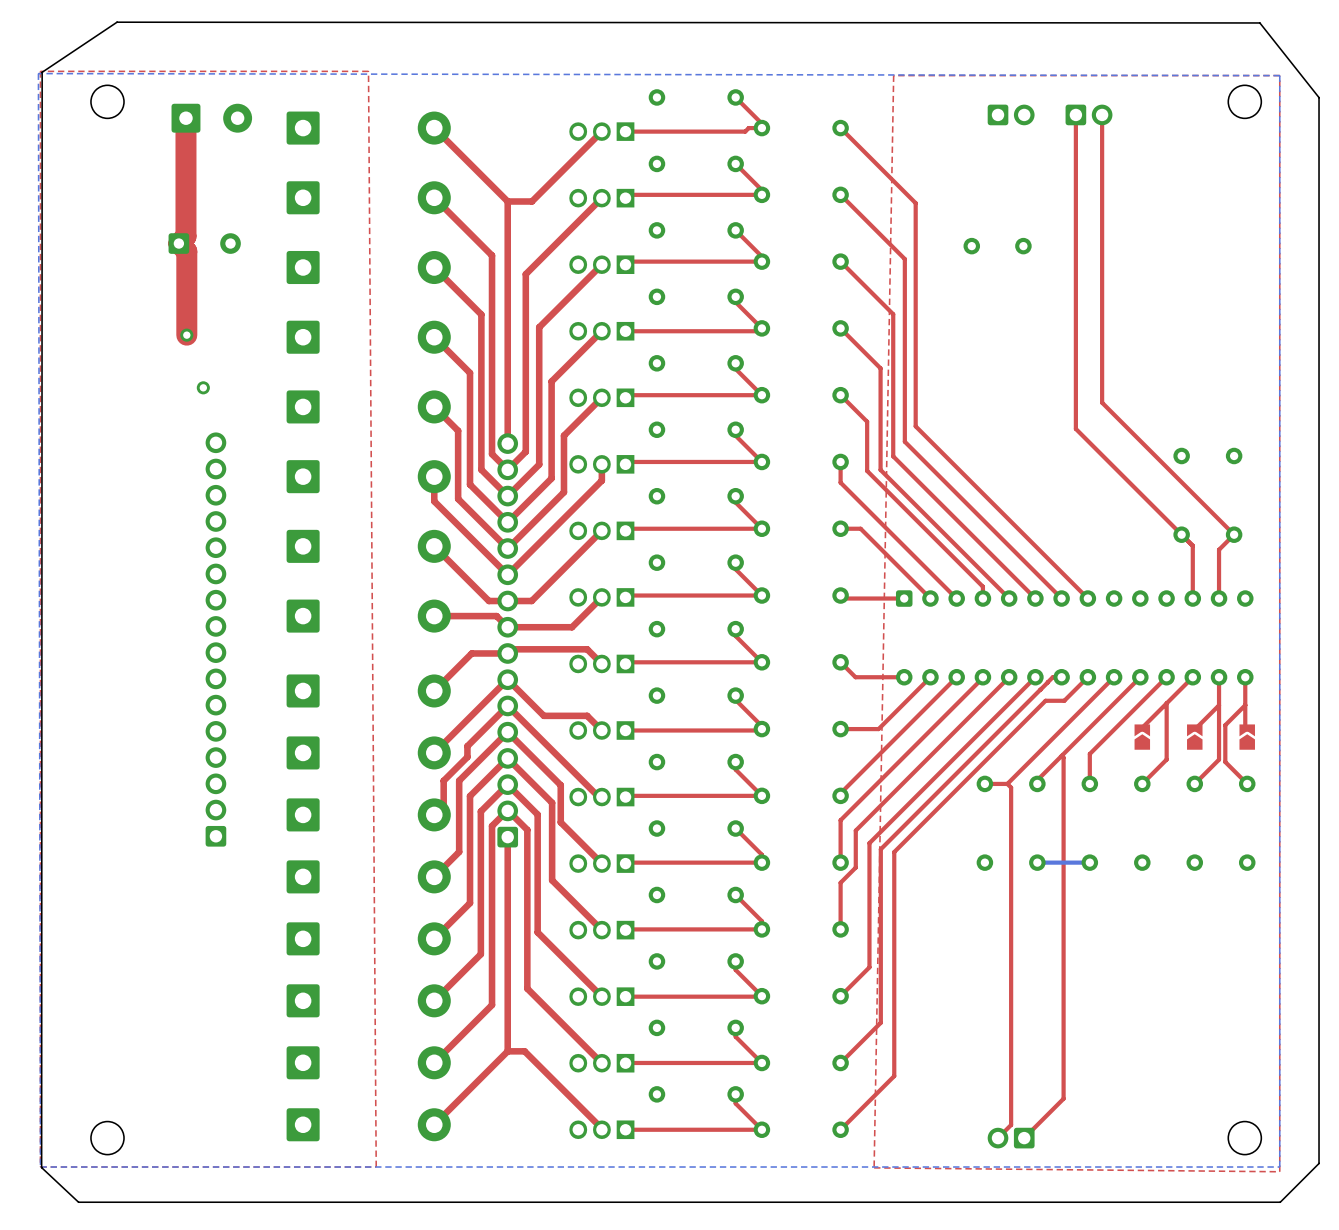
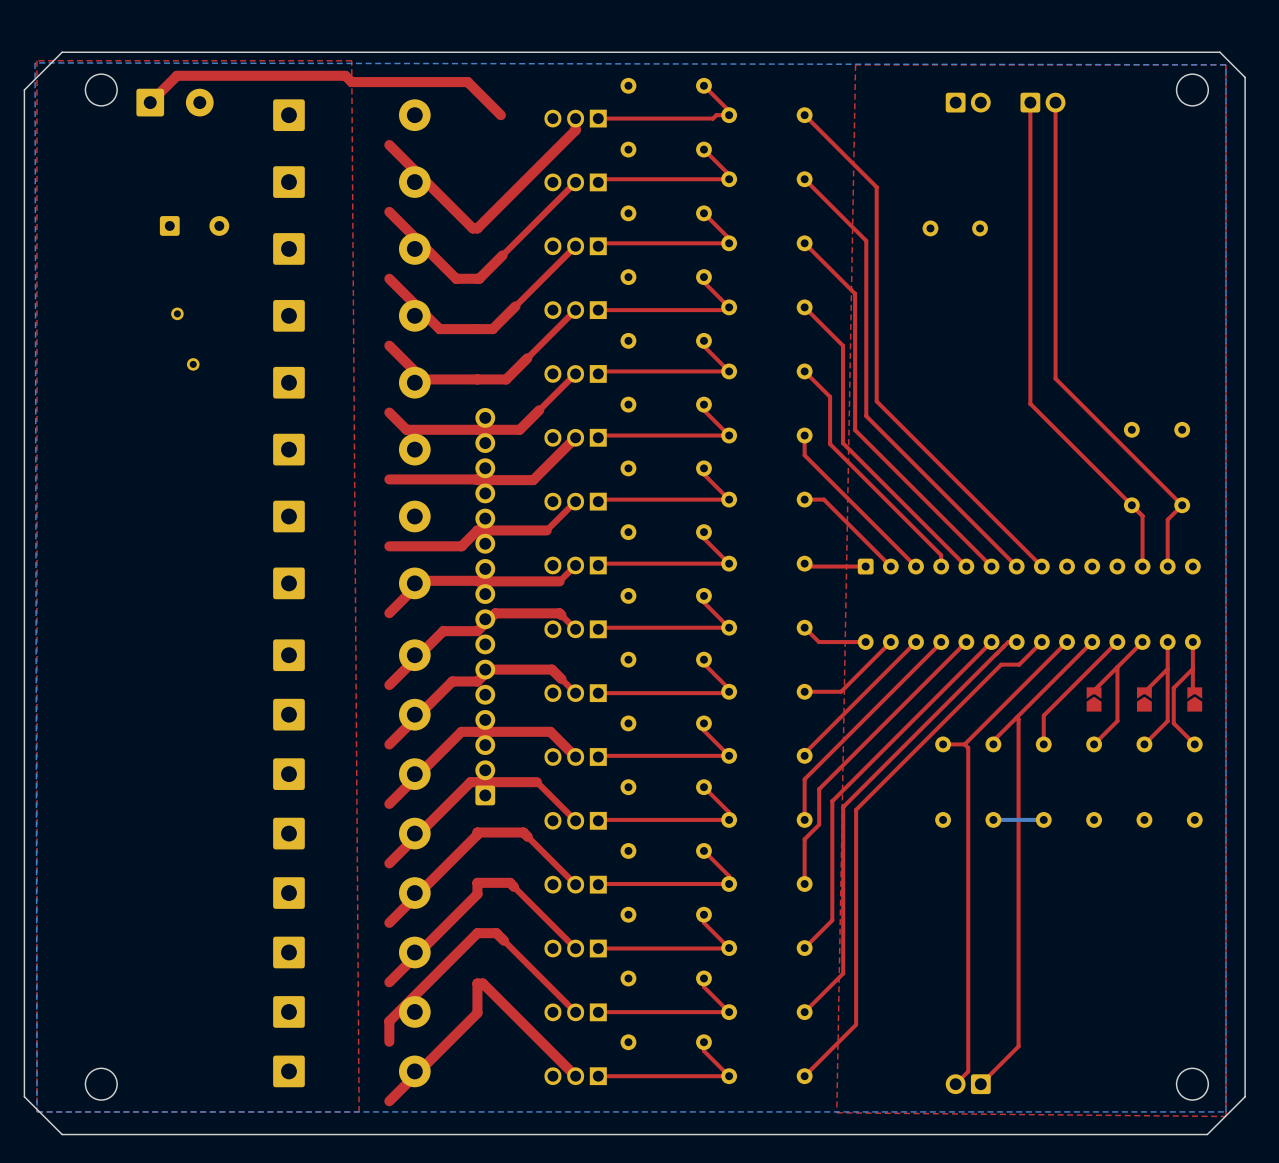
board edge: (117, 22) (42, 72) (41, 1167) (78, 1202) (1280, 1202) (1319, 1163) (1319, 97) (1259, 22) (117, 22) -> (1219, 52) (1245, 77) (1245, 1096) (1207, 1134) (62, 1134) (24, 1096) (24, 90) (62, 52) (1219, 52)
top track: none -> (150, 102) (177, 75) (345, 75) (351, 82) (467, 82) (500, 115)
top track: (185, 118) (185, 236) (178, 243) (186, 251) (186, 335) -> none
part position: (211, 118) -> (175, 102)
top track: (434, 128) (507, 201) -> none
top track: (601, 131) (531, 201) (507, 201) -> (575, 118) (575, 130) (477, 228) (472, 228) (389, 145)
top track: (434, 197) (492, 255) (492, 454) (507, 469) (525, 451) (525, 274) -> (389, 211) (456, 278) (479, 278) (502, 255)
top track: (507, 201) (507, 443) -> none
top track: (434, 267) (481, 314) (481, 469) (507, 496) (539, 464) (539, 327) -> (389, 278) (439, 329) (492, 329) (515, 306)
top track: (434, 337) (470, 372) (470, 484) (507, 522) (551, 478) (551, 381) -> (389, 345) (423, 379) (506, 379) (527, 358)
top track: (434, 406) (458, 430) (458, 498) (507, 548) -> none
top track: (563, 435) (563, 492) (507, 548) -> (539, 410) (519, 429) (406, 429) (389, 412)
top track: (601, 464) (601, 480) (507, 574) (434, 501) (434, 476) -> (575, 437) (533, 480) (389, 479)
top track: (434, 546) (488, 601) (531, 601) (571, 560) -> (389, 546) (461, 546) (477, 530) (546, 530)
top track: (585, 614) (572, 627) (507, 627) (496, 616) (434, 616) -> (559, 581) (421, 580) (389, 613)
part: (215, 639) -> none
top track: (587, 649) (511, 649) (507, 653) (471, 653) (434, 690) -> (561, 615) (559, 613) (495, 613) (477, 631) (443, 631) (389, 685)
top track: (507, 679) (543, 715) (587, 715) -> (389, 744) (452, 681) (477, 681) (489, 669) (552, 669) (561, 679)
top track: (507, 679) (434, 752) -> none
top track: (601, 797) (598, 797) (507, 705) (467, 746) (467, 757) (443, 780) (443, 805) (434, 814) -> (575, 756) (550, 731) (461, 731) (389, 803)
top track: (561, 823) (560, 785) (507, 732) (459, 780) (459, 851) (434, 876) -> (536, 782) (470, 782) (389, 863)
top track: (507, 837) (507, 1051) -> none
top track: (552, 880) (552, 802) (507, 758) (470, 796) (470, 903) (434, 938) -> (527, 836) (523, 832) (477, 832) (477, 834) (389, 922)
top track: (537, 932) (537, 814) (507, 784) (480, 811) (480, 954) (434, 1000) -> (514, 886) (509, 882) (477, 882) (477, 894) (389, 982)
top track: (527, 988) (527, 829) (507, 810) (492, 826) (492, 1005) (434, 1062) -> (504, 940) (496, 933) (477, 933) (389, 1021) (389, 1041)
top track: (507, 1051) (524, 1051) (601, 1129) -> (389, 1101) (477, 1013) (477, 983) (482, 983) (575, 1076)
top track: (507, 1051) (434, 1124) -> none

